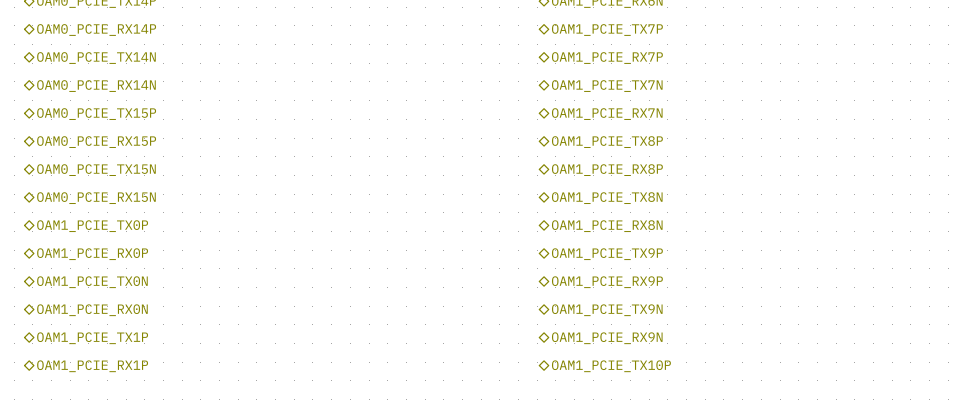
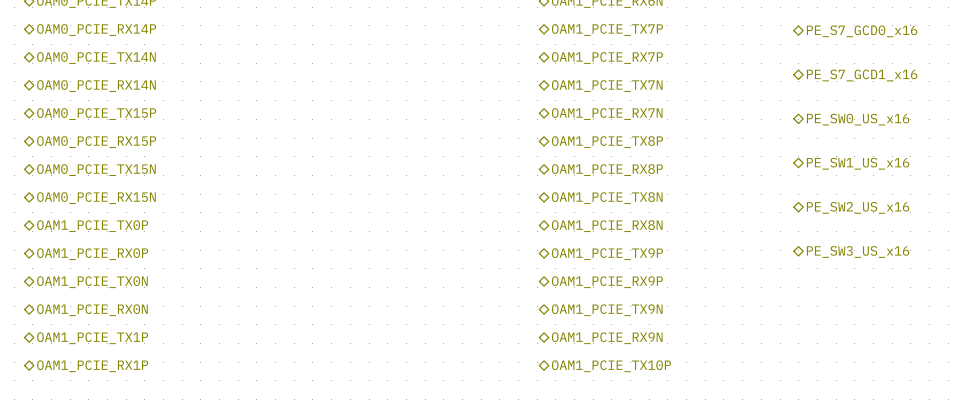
hierarchical label: none -> PE_S7_GCD0_x16 (862, 31)
hierarchical label: none -> PE_S7_GCD1_x16 (862, 75)
hierarchical label: none -> PE_SW0_US_x16 (858, 119)
hierarchical label: none -> PE_SW1_US_x16 (858, 163)
hierarchical label: none -> PE_SW2_US_x16 (858, 207)
hierarchical label: none -> PE_SW3_US_x16 (858, 251)

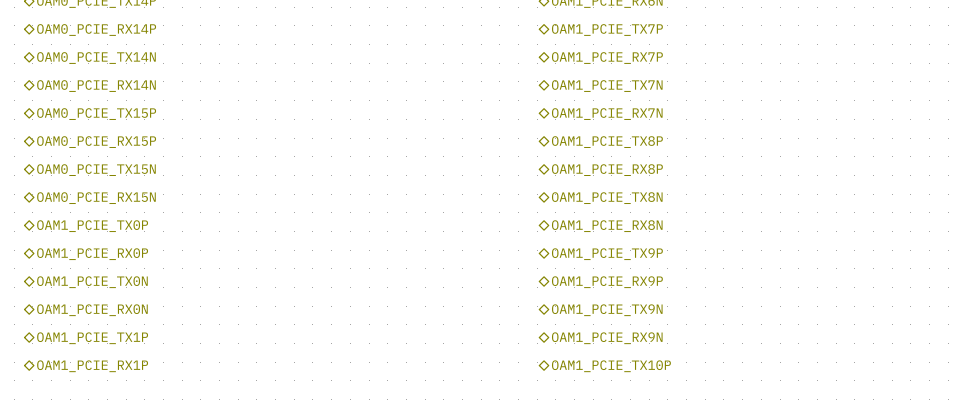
hierarchical label: PE_S7_GCD0_x16 (862, 31) -> none
hierarchical label: PE_S7_GCD1_x16 (862, 75) -> none
hierarchical label: PE_SW0_US_x16 (858, 119) -> none
hierarchical label: PE_SW1_US_x16 (858, 163) -> none
hierarchical label: PE_SW2_US_x16 (858, 207) -> none
hierarchical label: PE_SW3_US_x16 (858, 251) -> none

